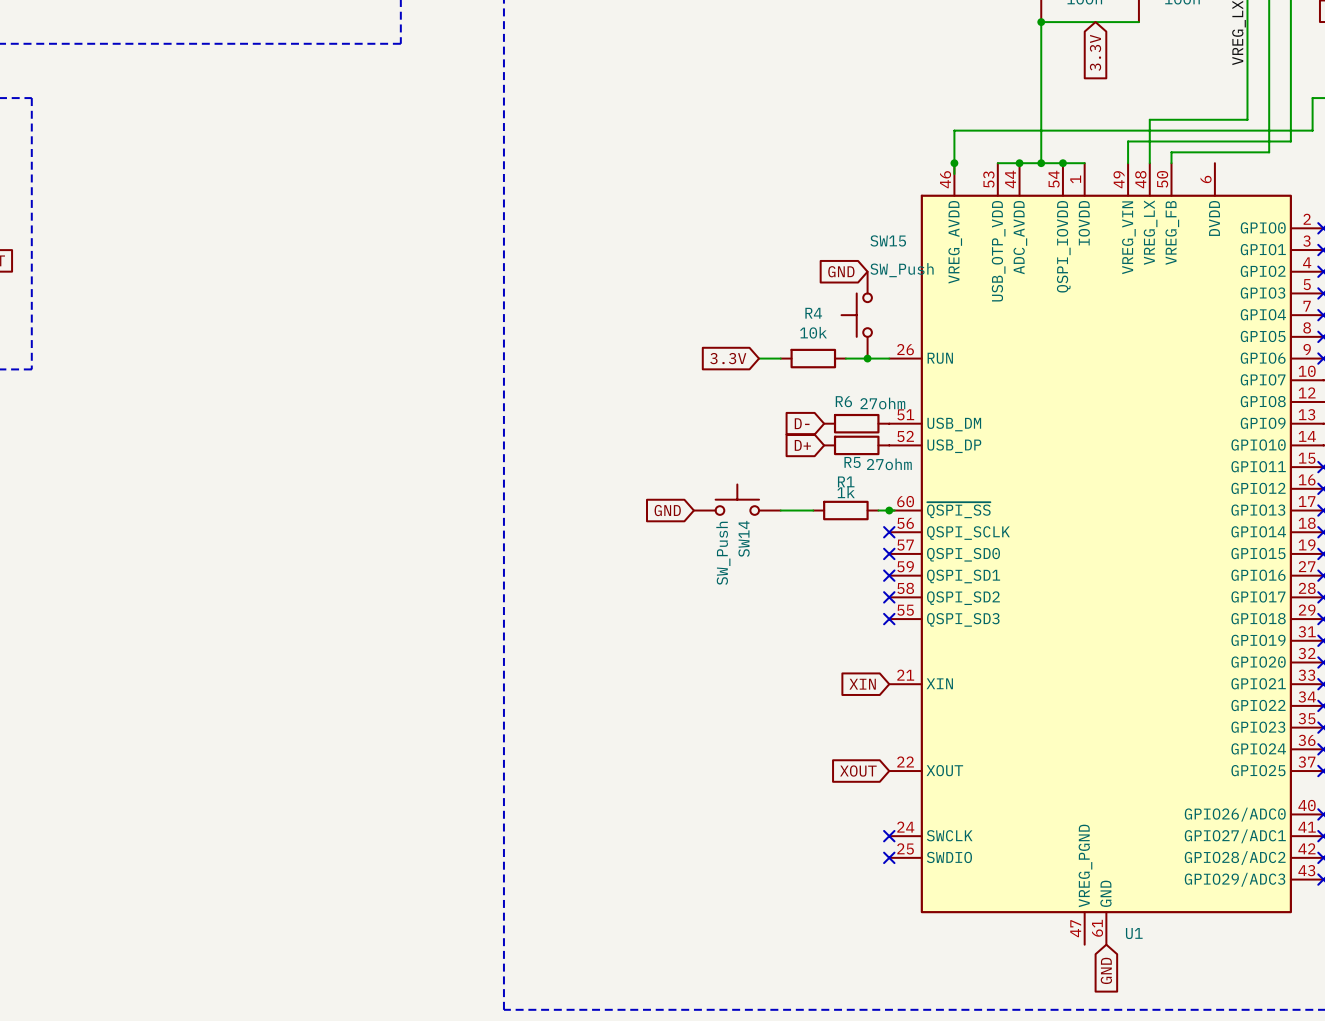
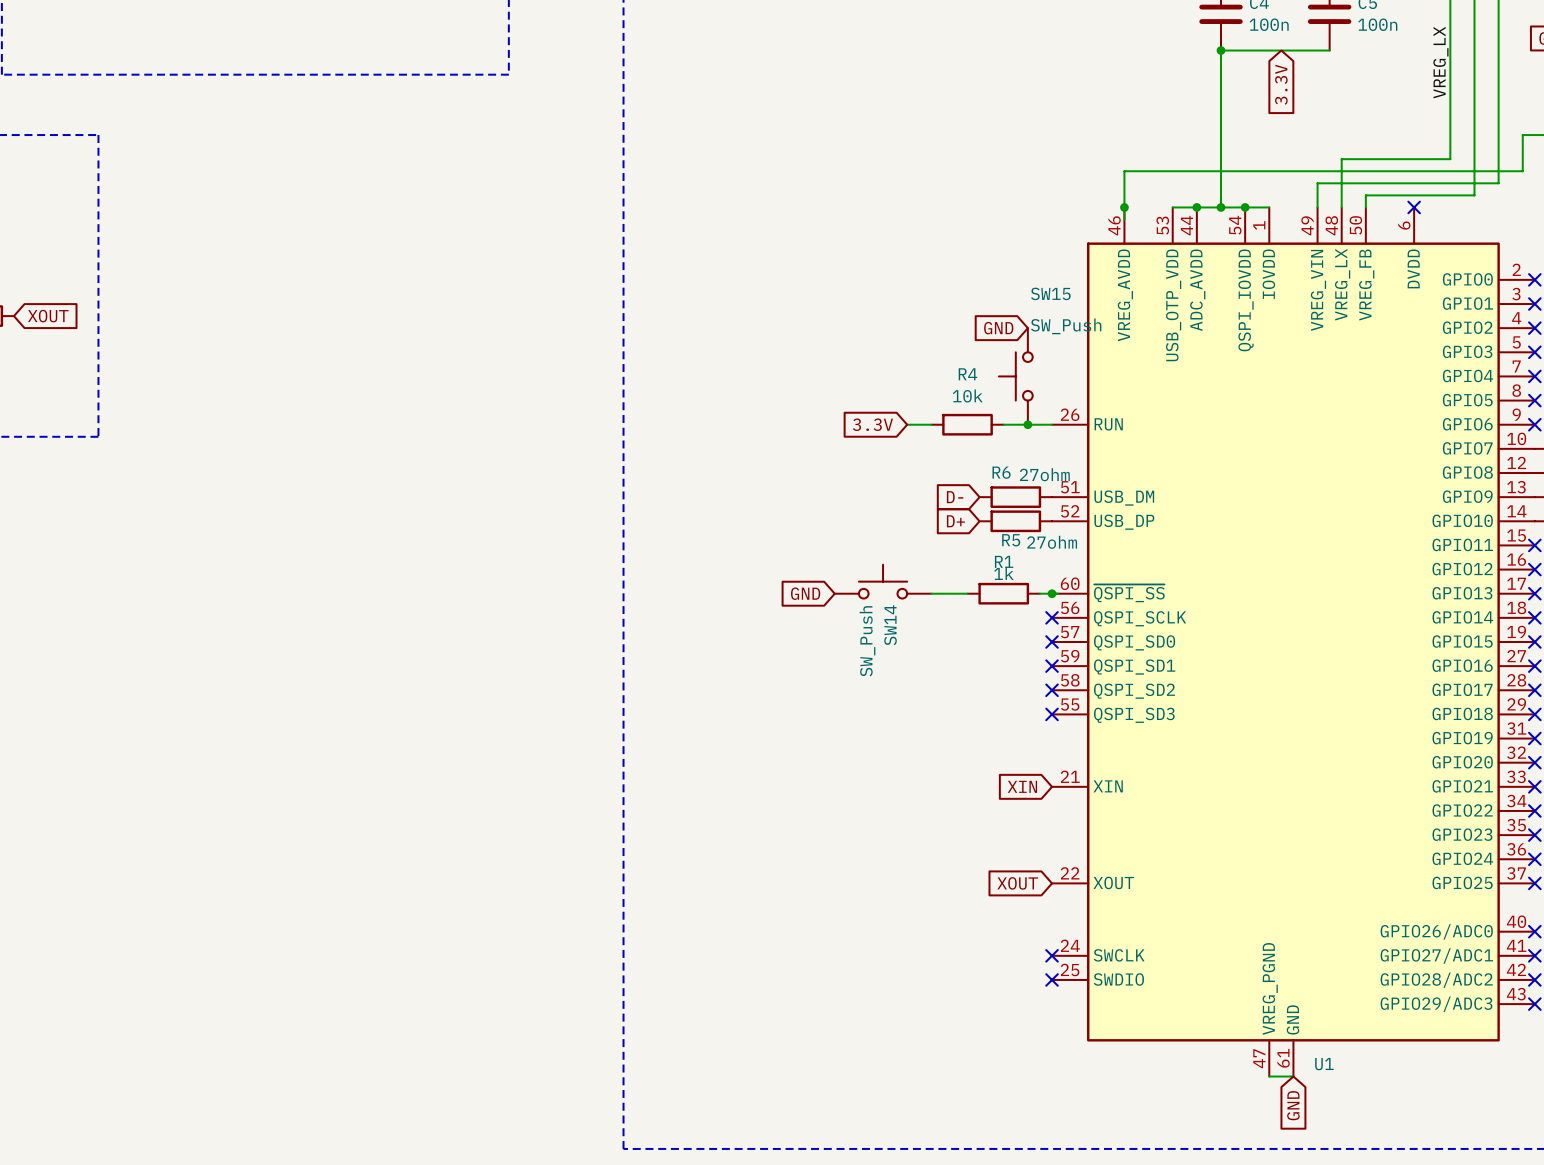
no-connect mark: none -> (1414, 207)
wire: none -> (1269, 1076) (1293, 1076)

